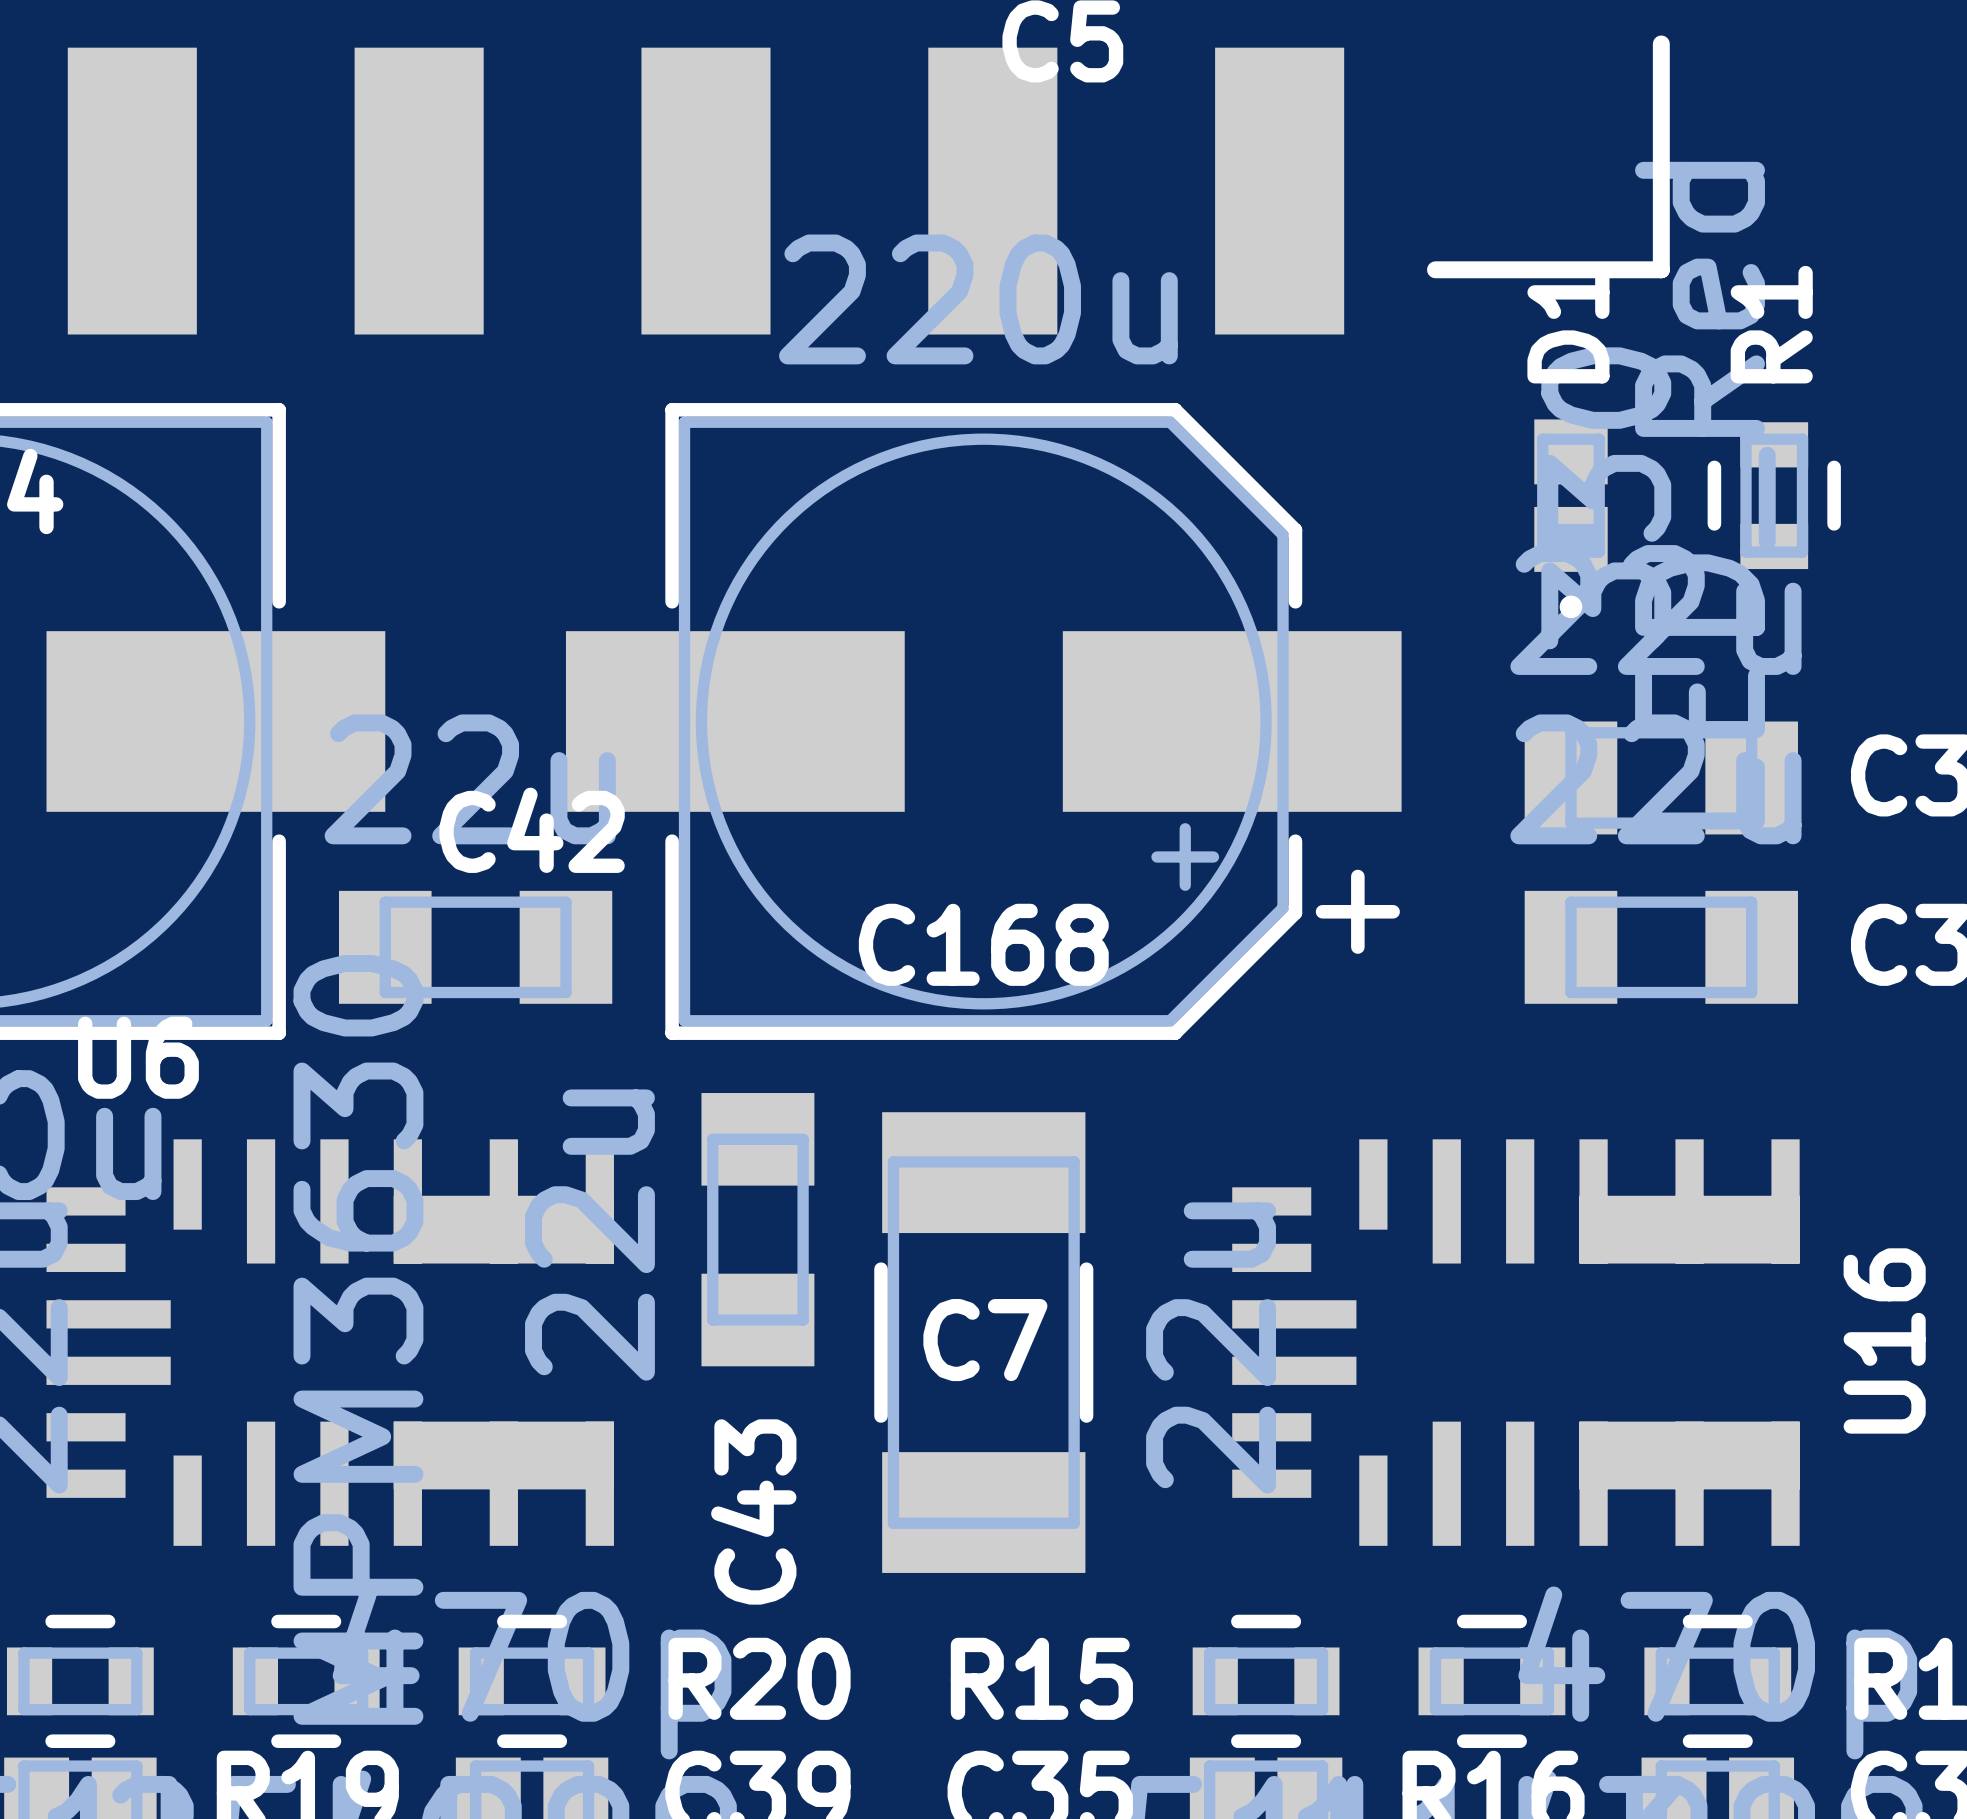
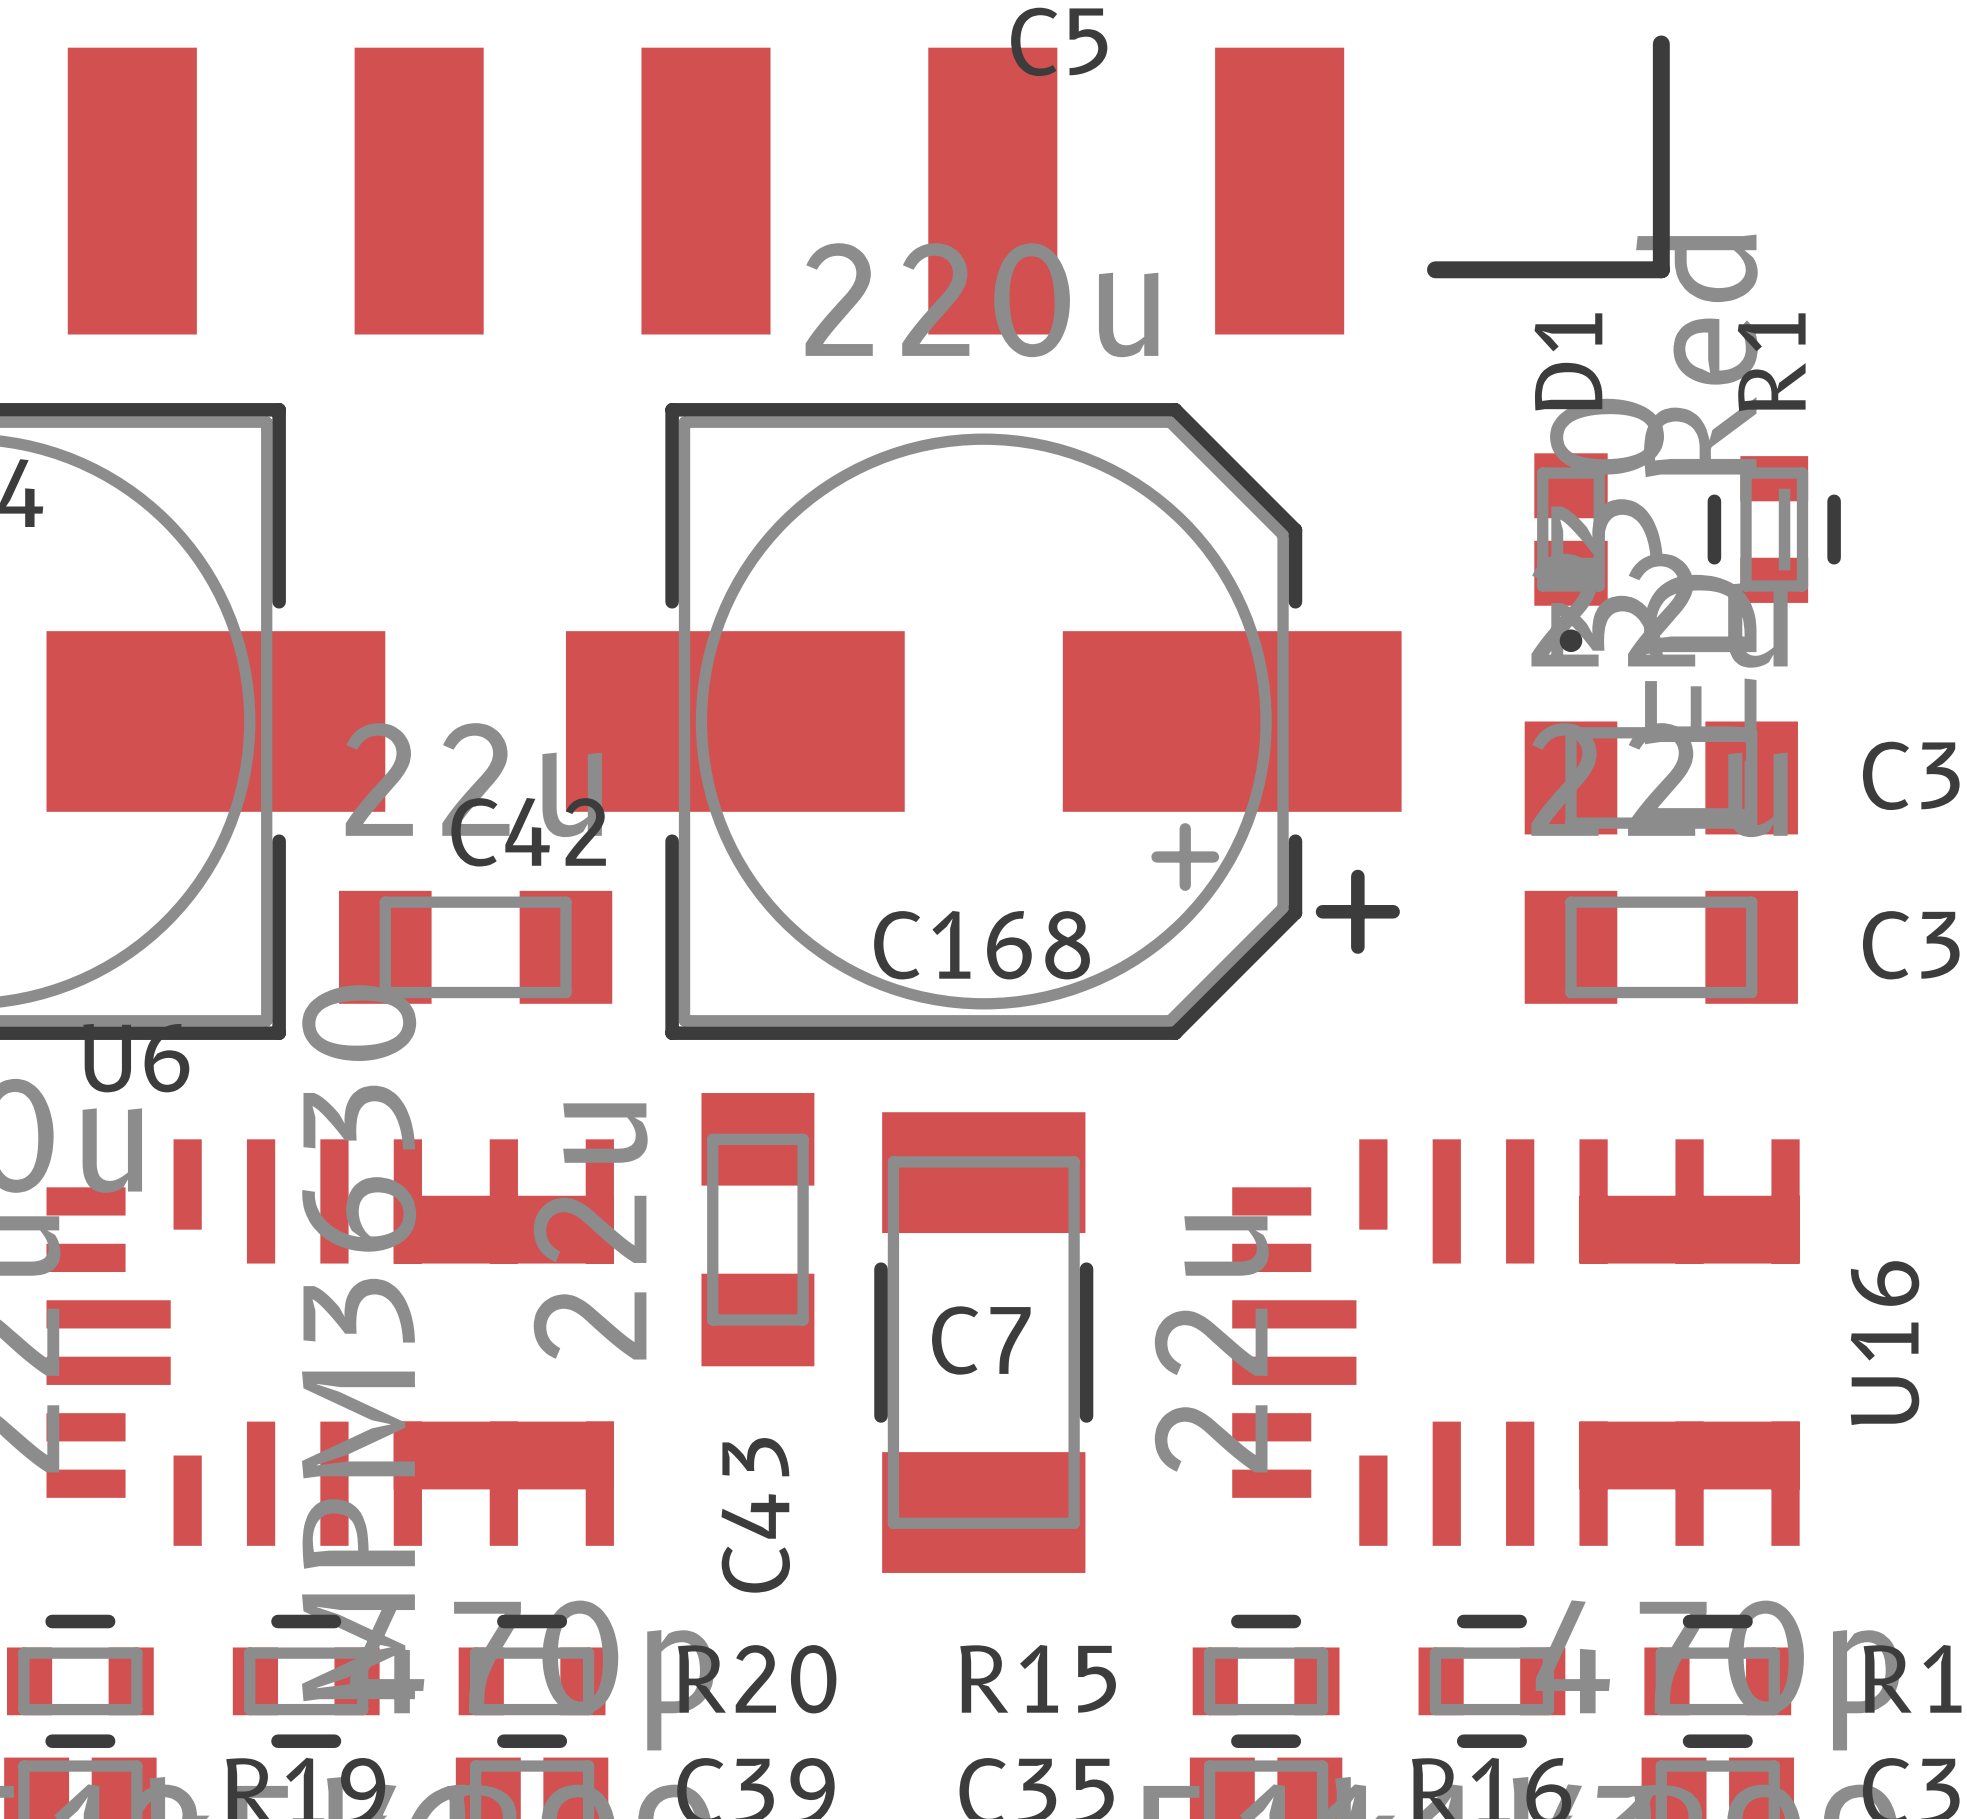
R1 position: (1774, 495) -> (1774, 529)
D1 position: (1570, 518) -> (1570, 552)

